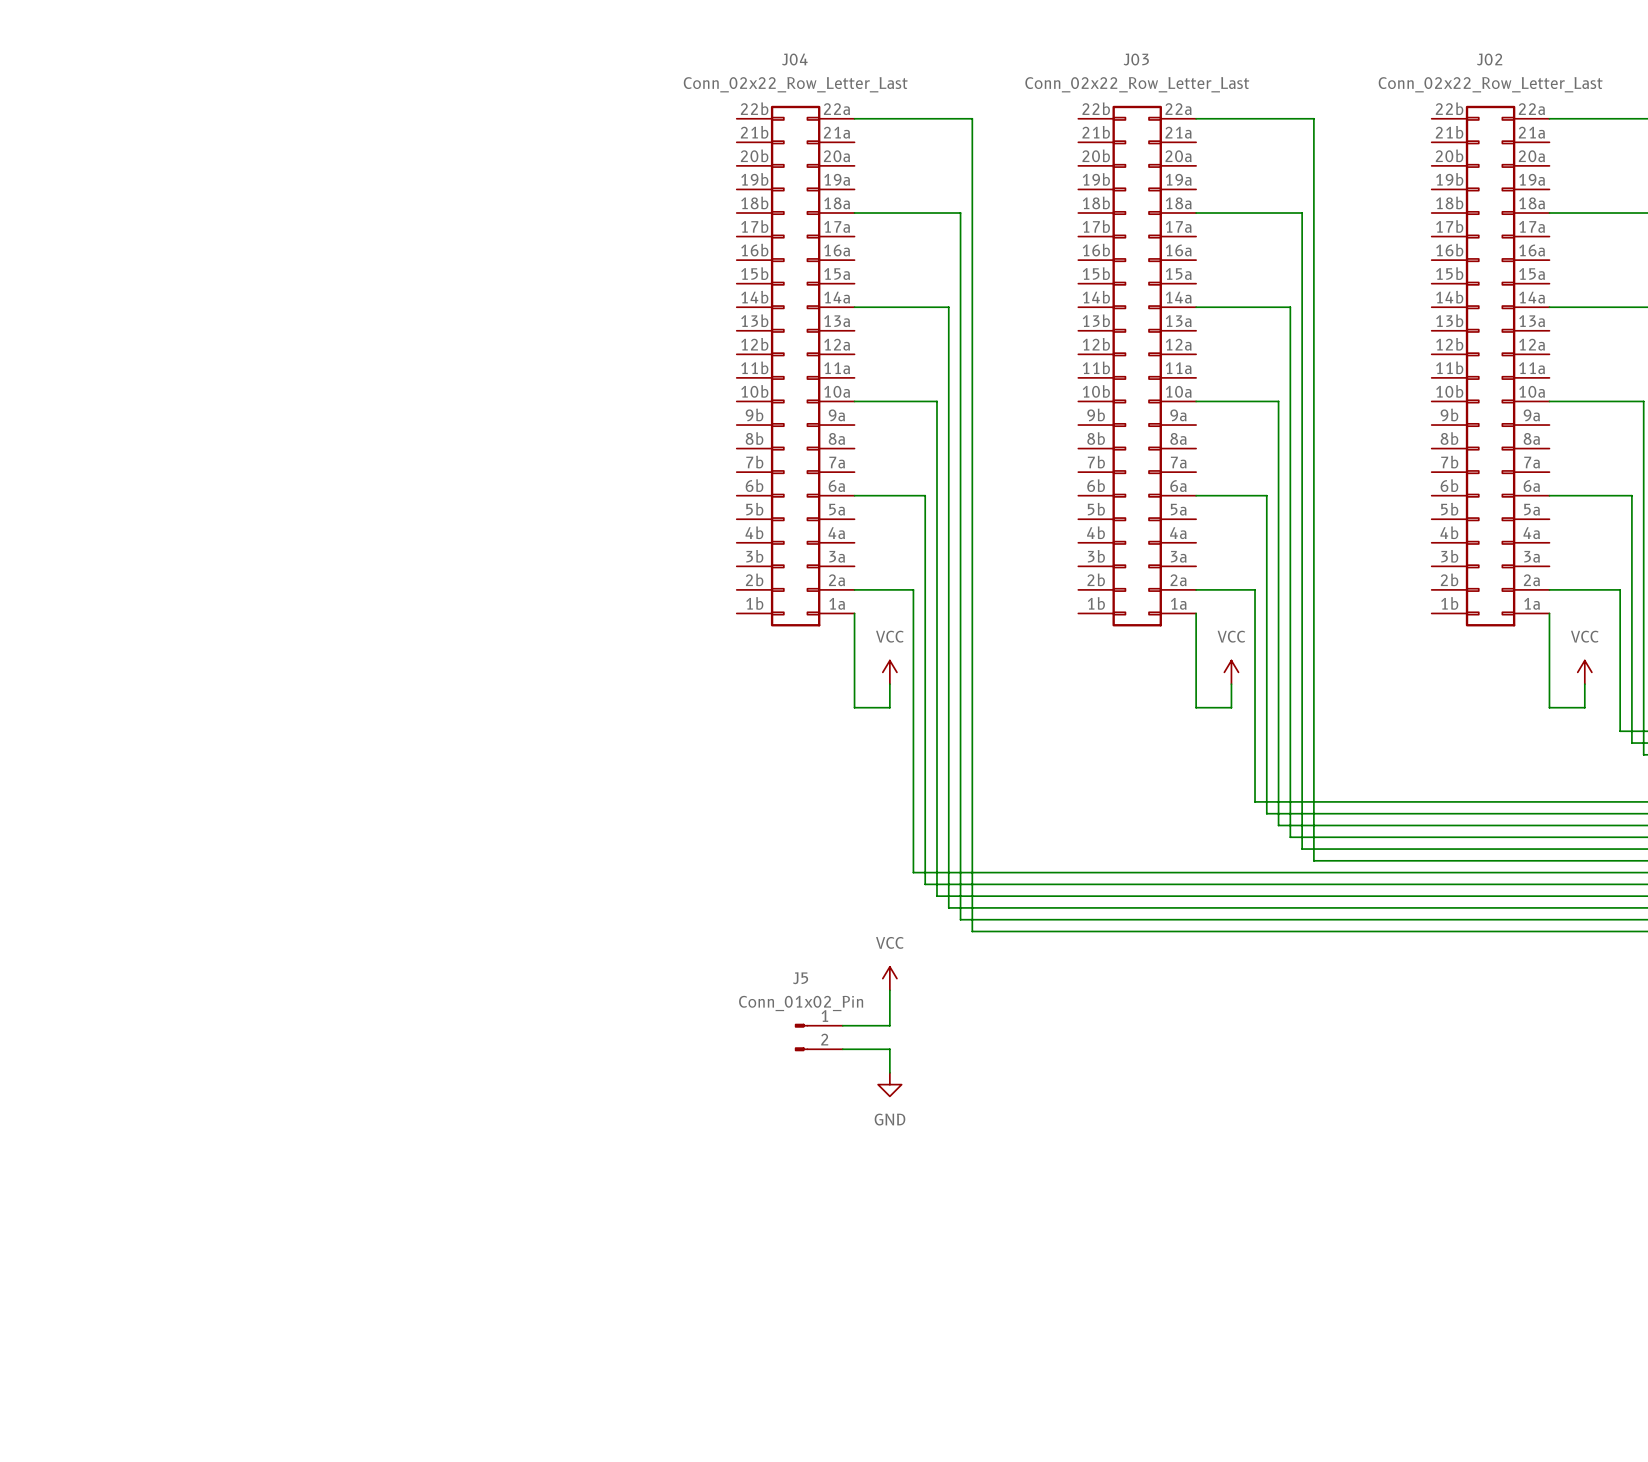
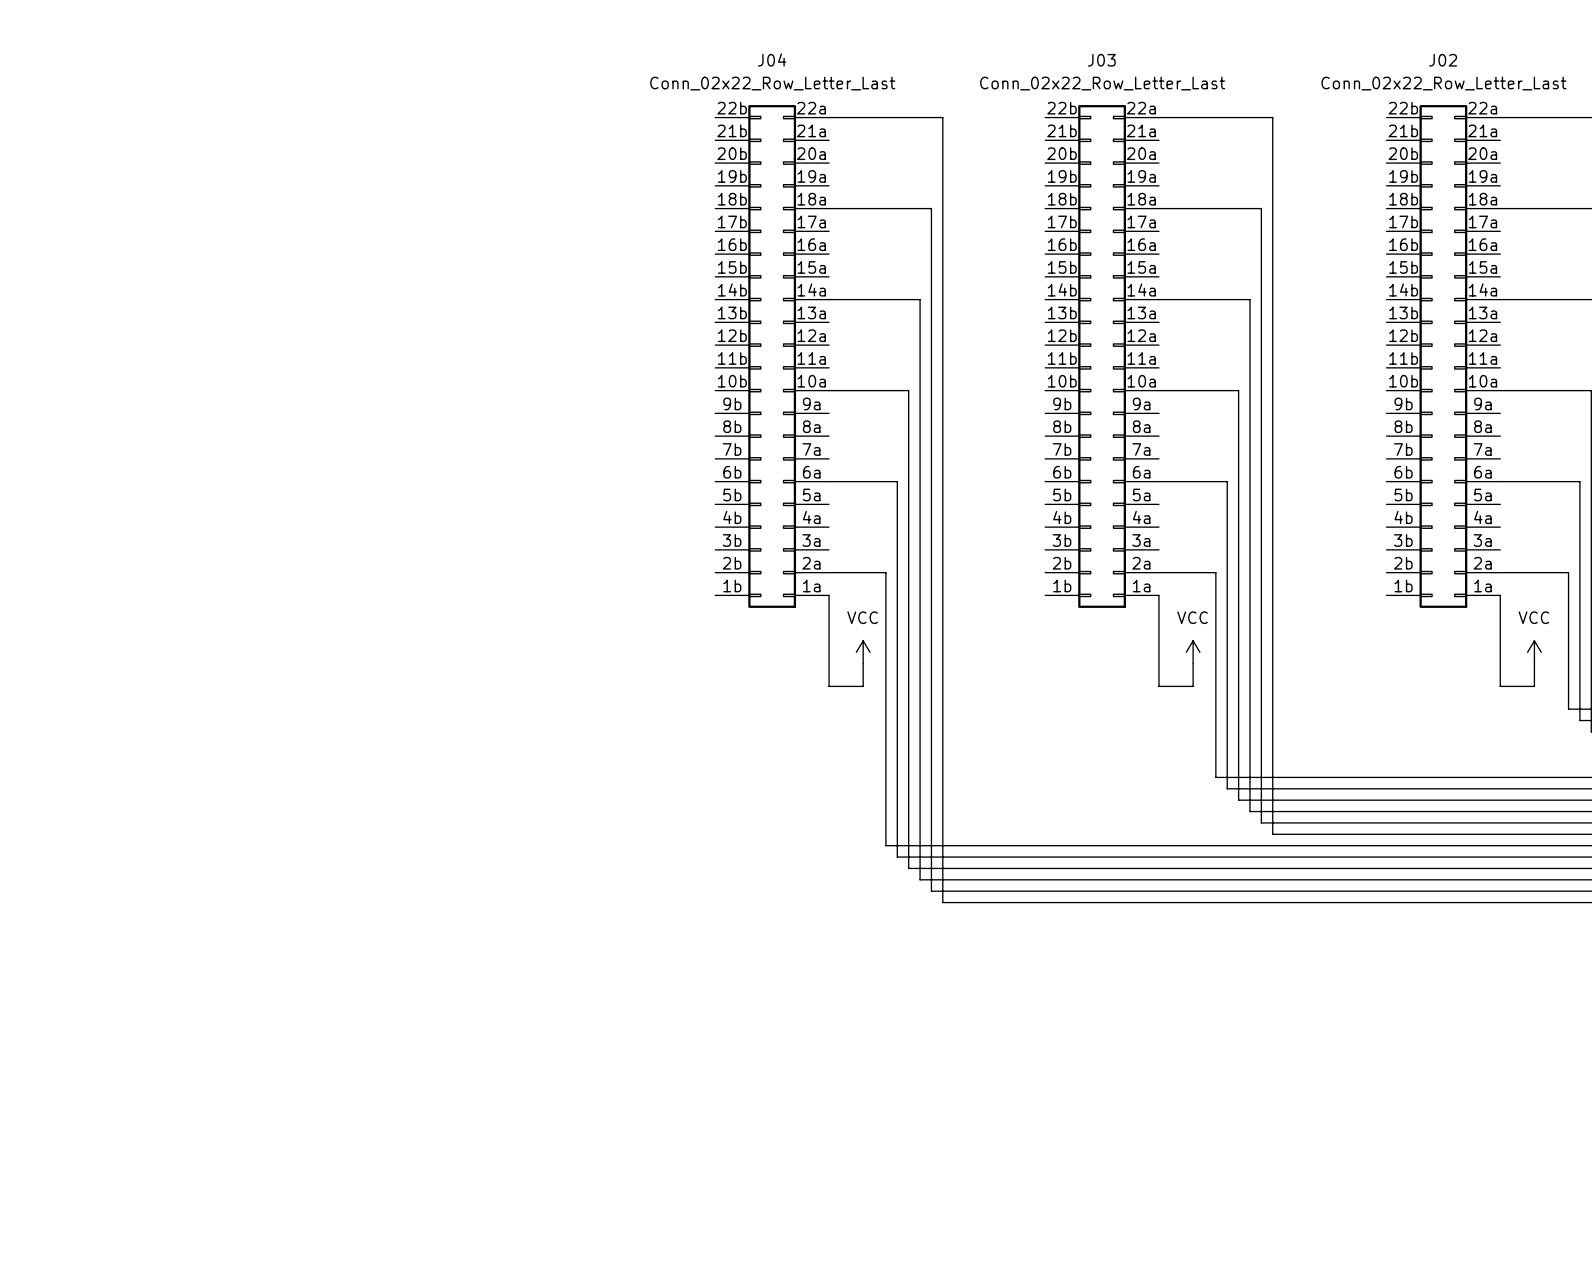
power symbol: VCC (889, 978) -> none
wire: (889, 990) (889, 1025) (842, 1025) -> none
J5: Conn_01x02_Pin (818, 1037) -> none
wire: (842, 1049) (889, 1049) (889, 1072) -> none
power symbol: GND (889, 1084) -> none

